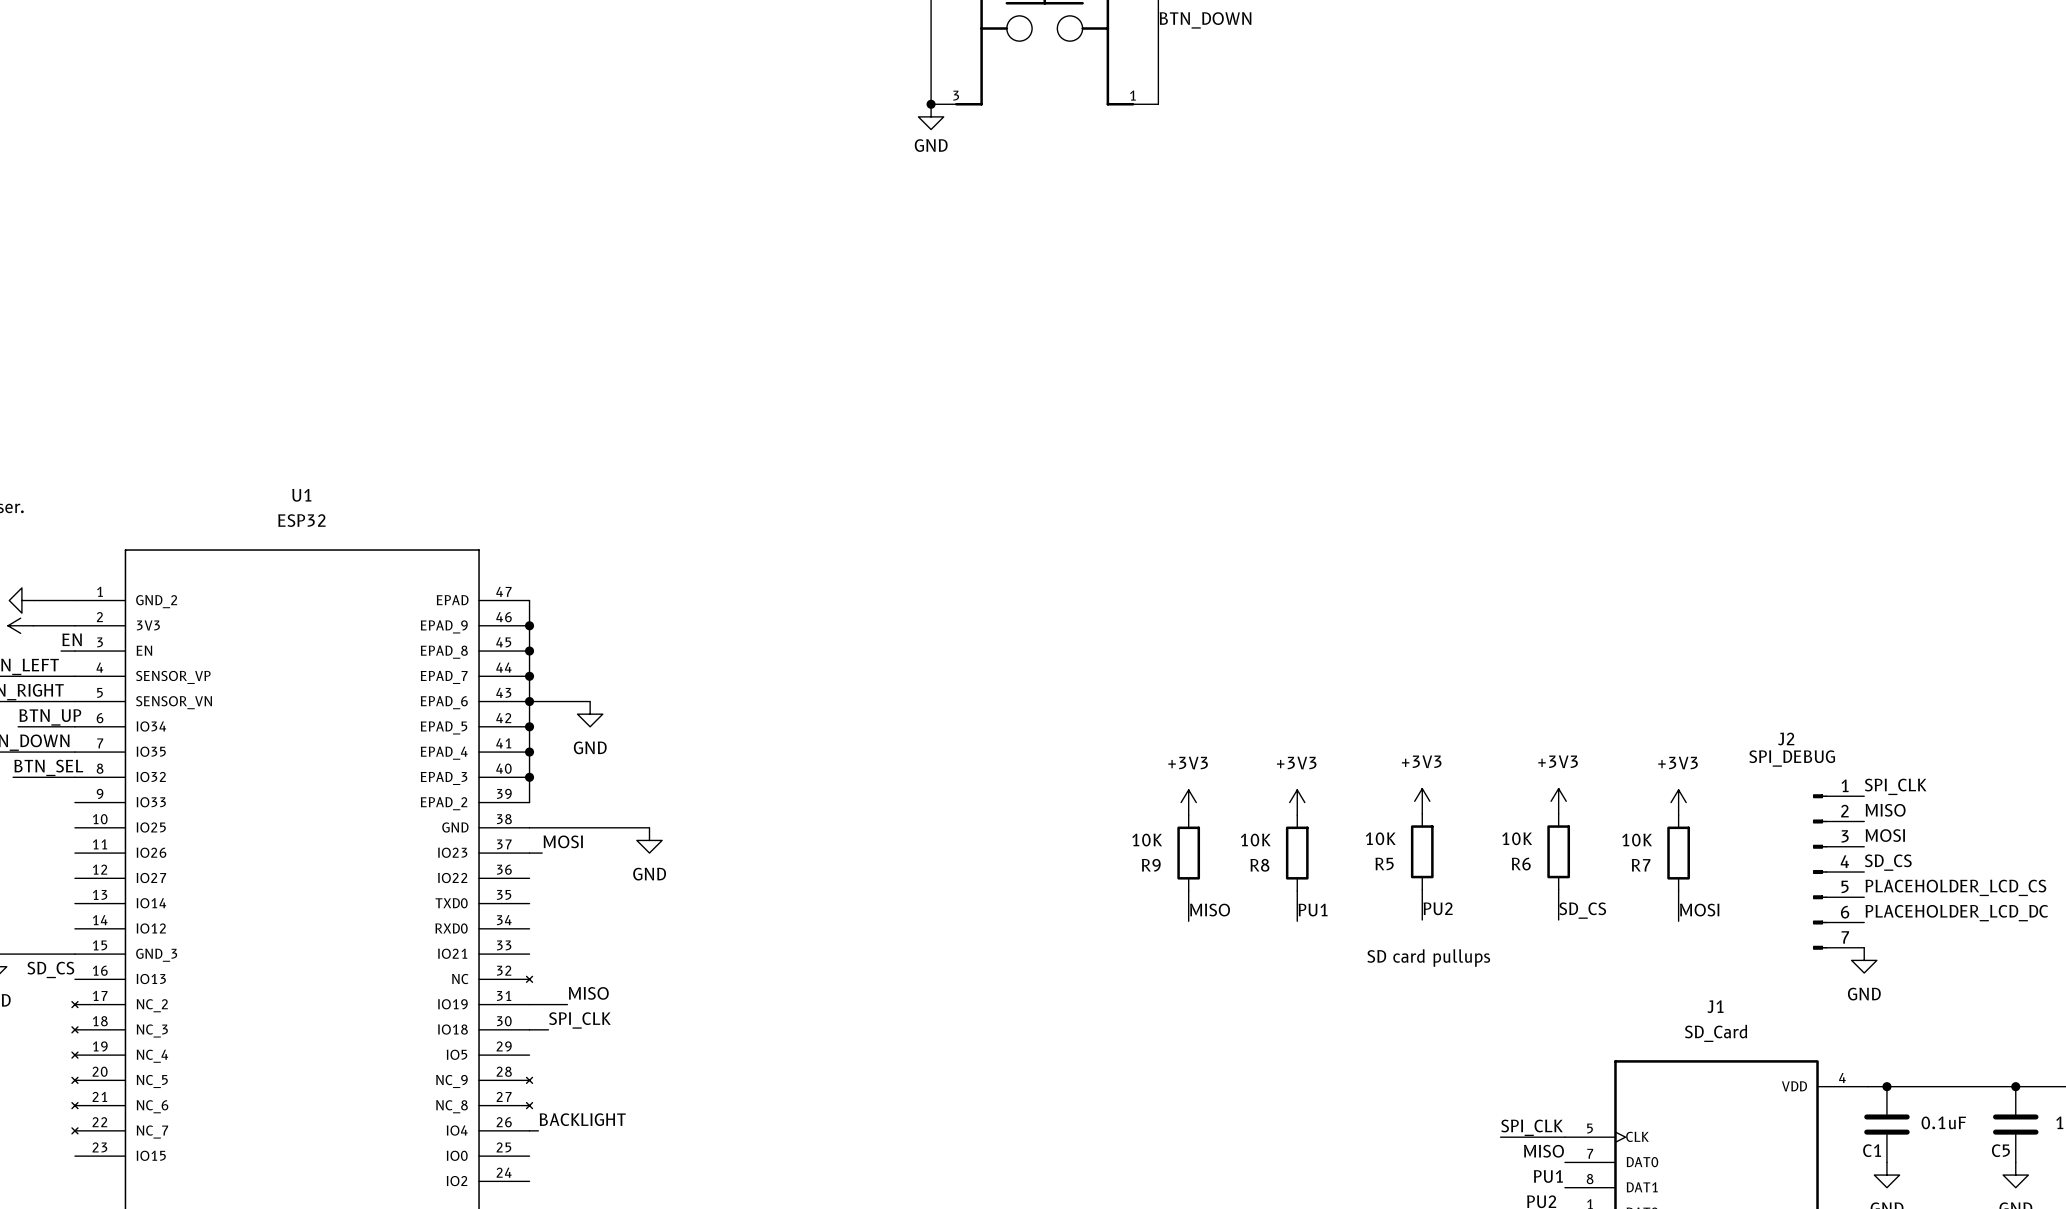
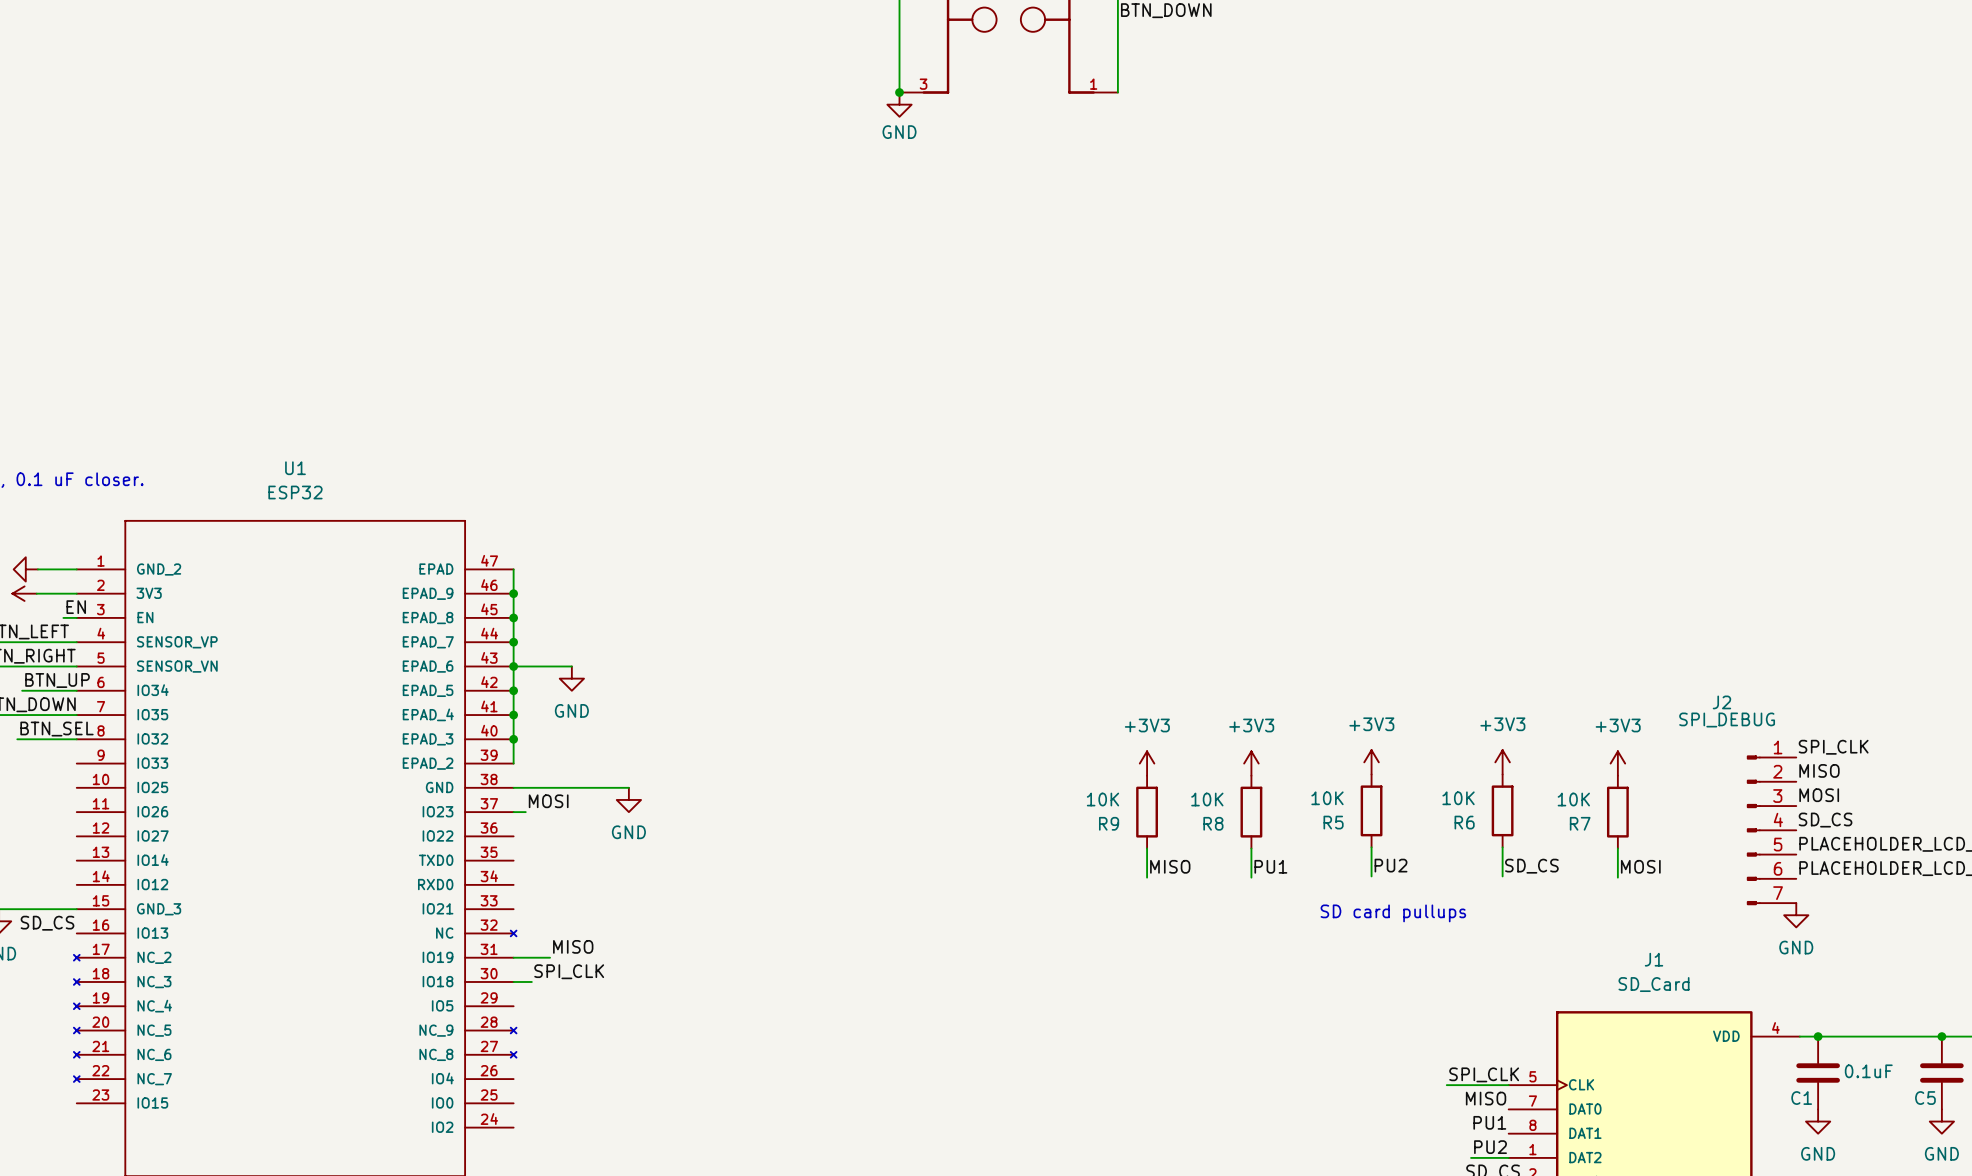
label: BACKLIGHT (582, 1119) -> none
wire: (529, 1130) (538, 1130) -> none

